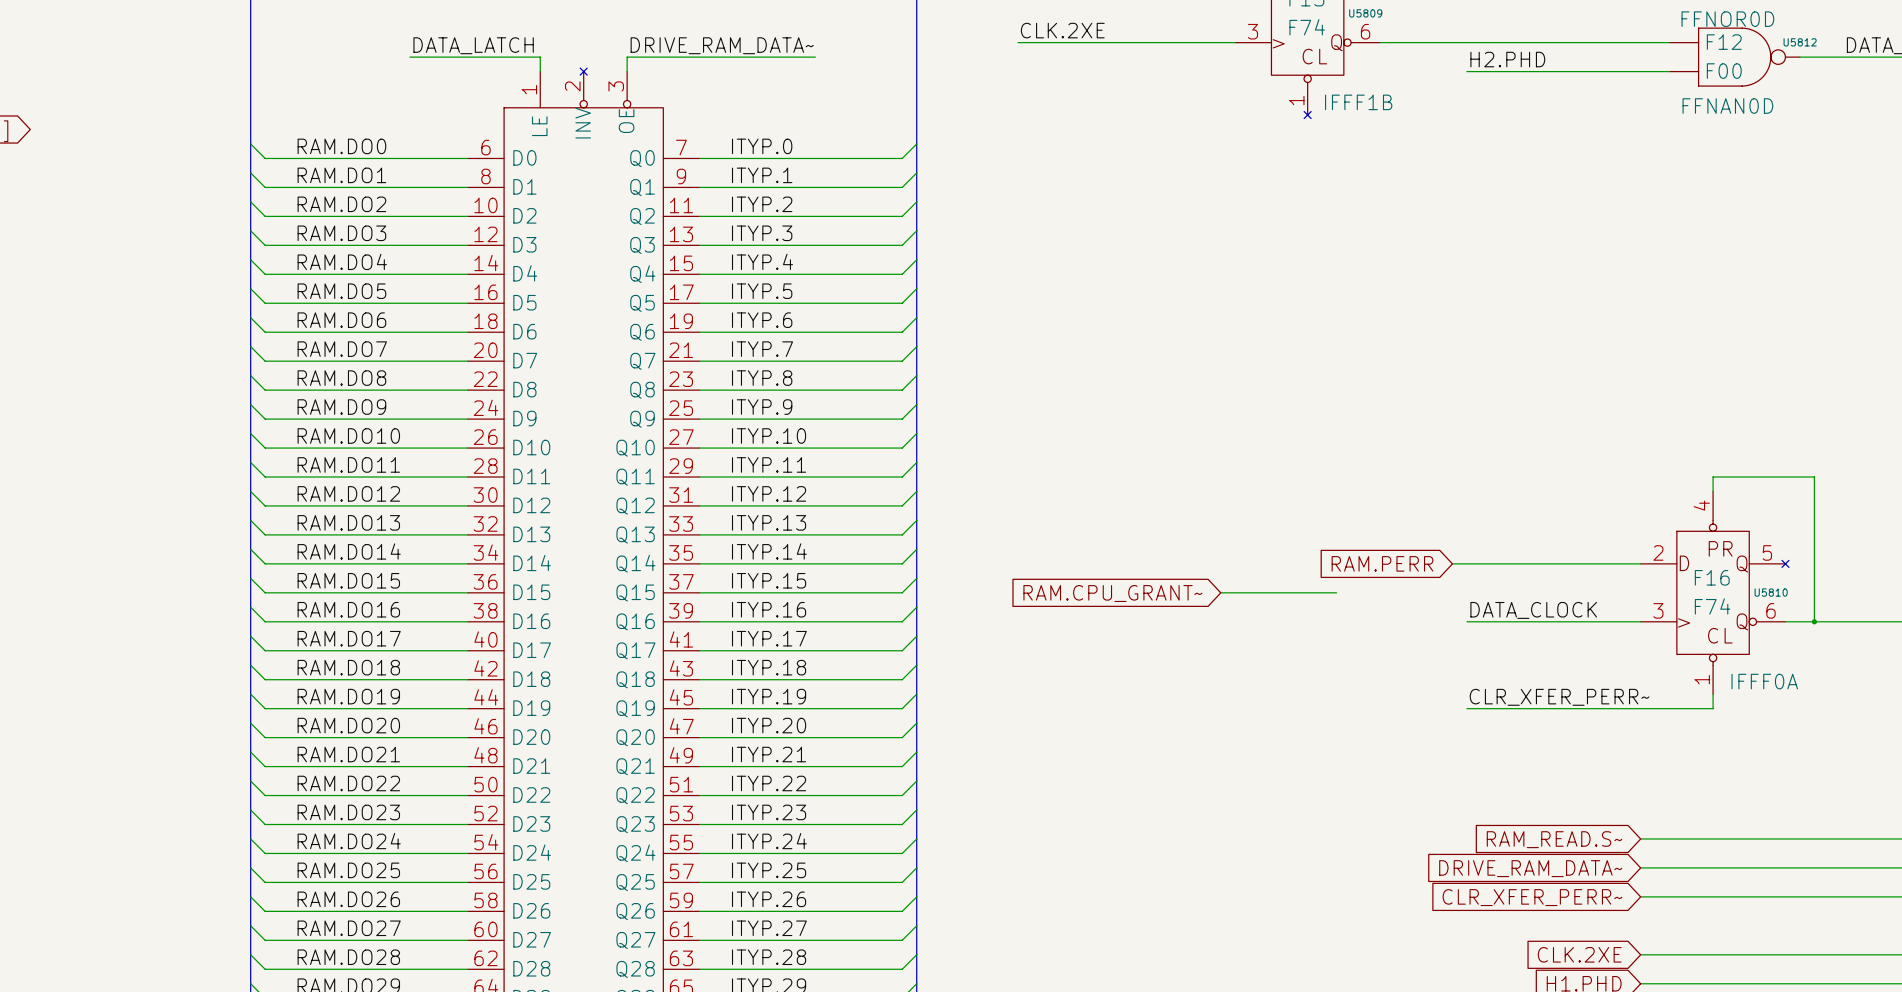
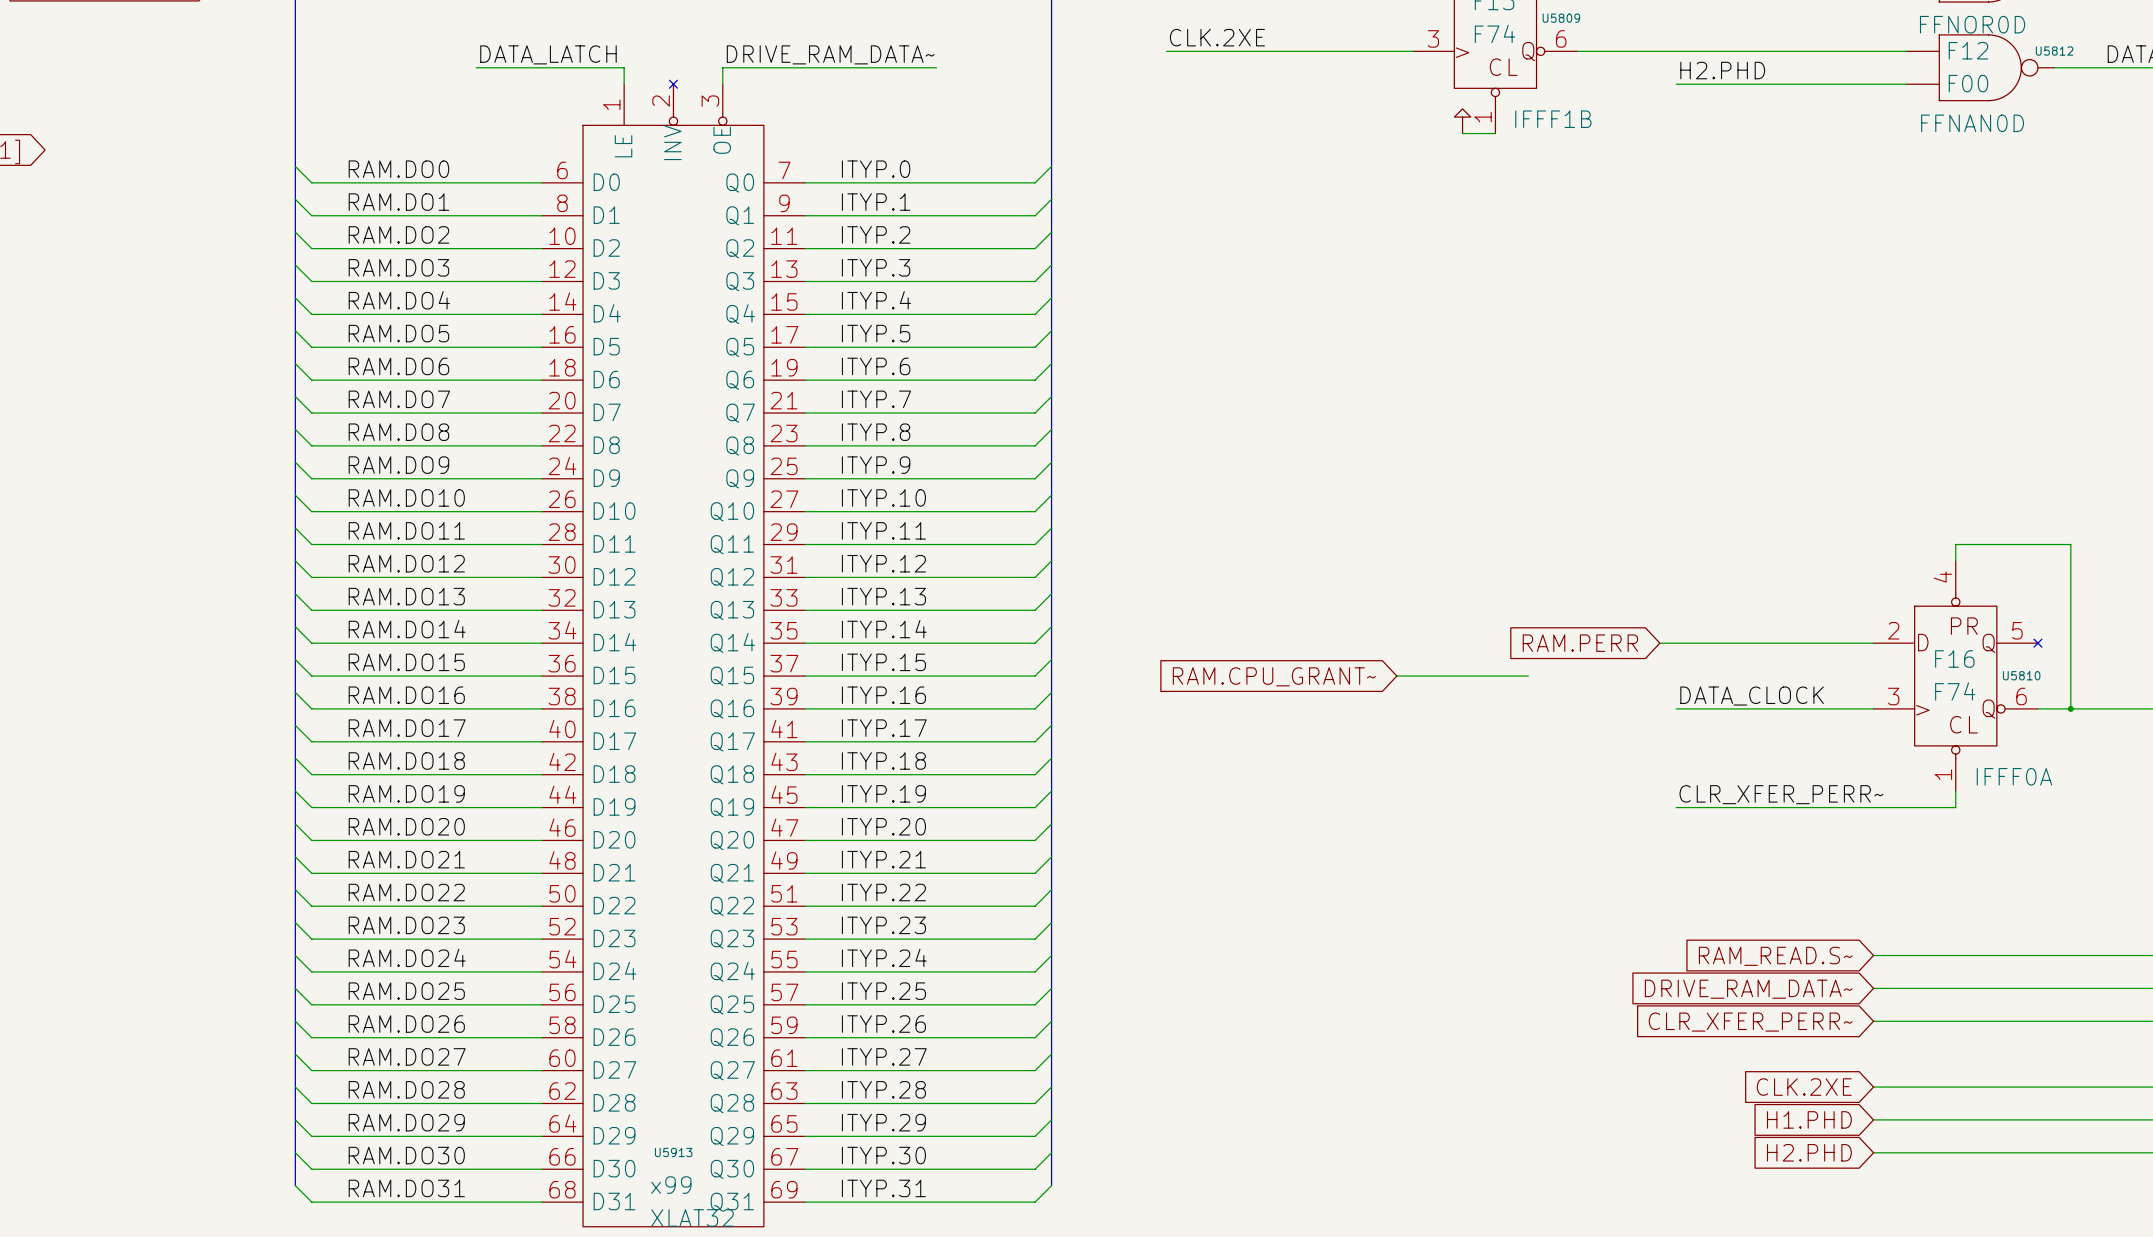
power symbol: none -> (1462, 120)
wire: none -> (1462, 133) (1495, 133)
no-connect mark: (1307, 115) -> none

